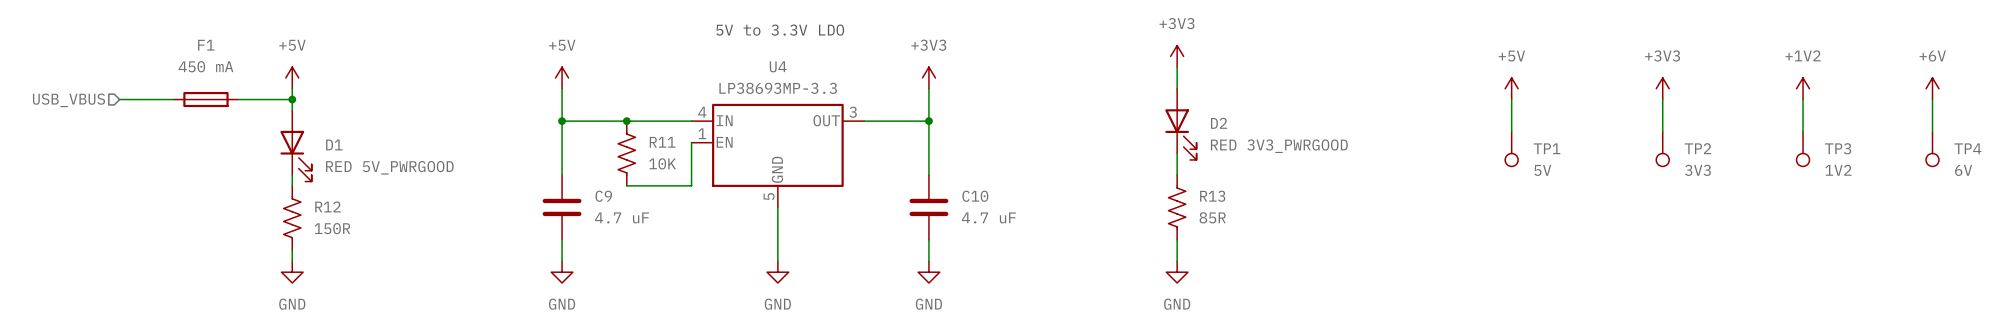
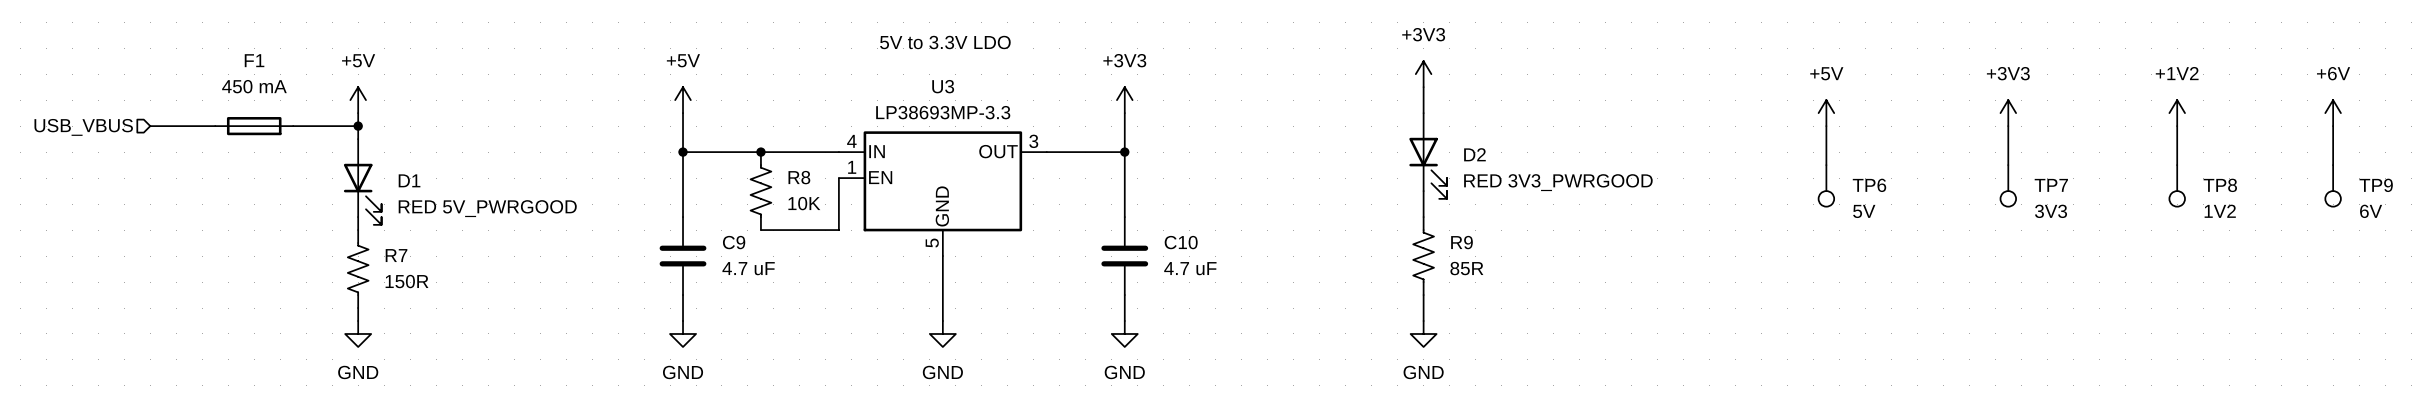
U4 name: U4 (778, 66) -> U3 (943, 86)
R11 name: R11 (662, 142) -> R8 (799, 177)
TP1 name: TP1 (1546, 148) -> TP6 (1869, 185)
TP2 name: TP2 (1697, 148) -> TP7 (2051, 185)
TP3 name: TP3 (1838, 148) -> TP8 (2220, 185)
TP4 name: TP4 (1967, 148) -> TP9 (2376, 185)
R13 name: R13 (1212, 196) -> R9 (1461, 242)
R12 name: R12 (327, 206) -> R7 (396, 255)

